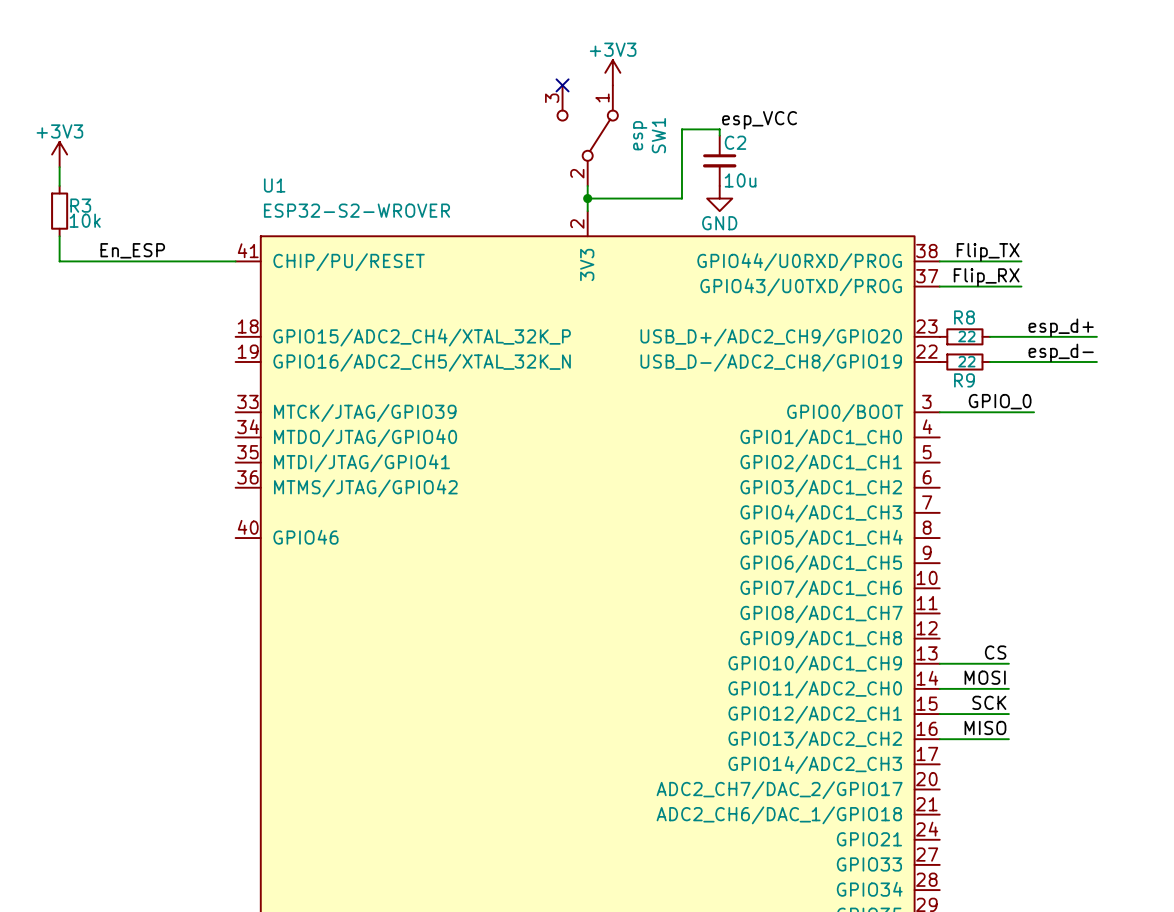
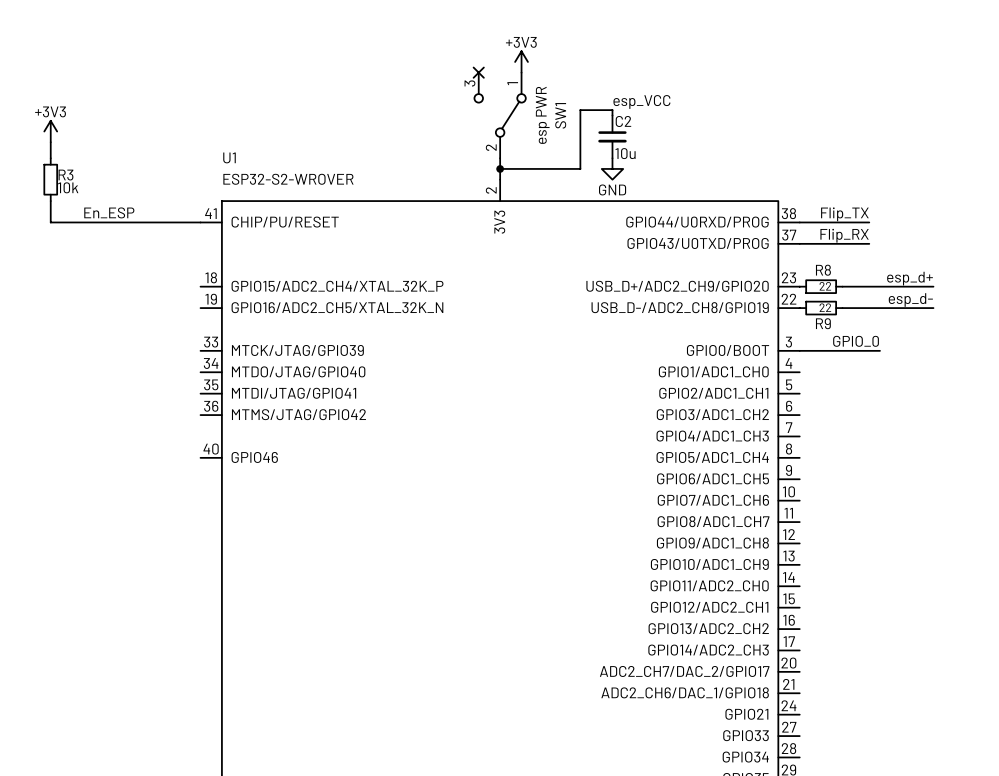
SW1 value: esp (640, 135) -> esp PWR (542, 115)
label: CS (995, 652) -> none
wire: (939, 663) (1008, 663) -> none
label: MOSI (985, 677) -> none
wire: (939, 688) (1008, 688) -> none
label: SCK (989, 702) -> none
wire: (939, 714) (1008, 714) -> none
label: MISO (985, 727) -> none
wire: (939, 739) (1008, 739) -> none

